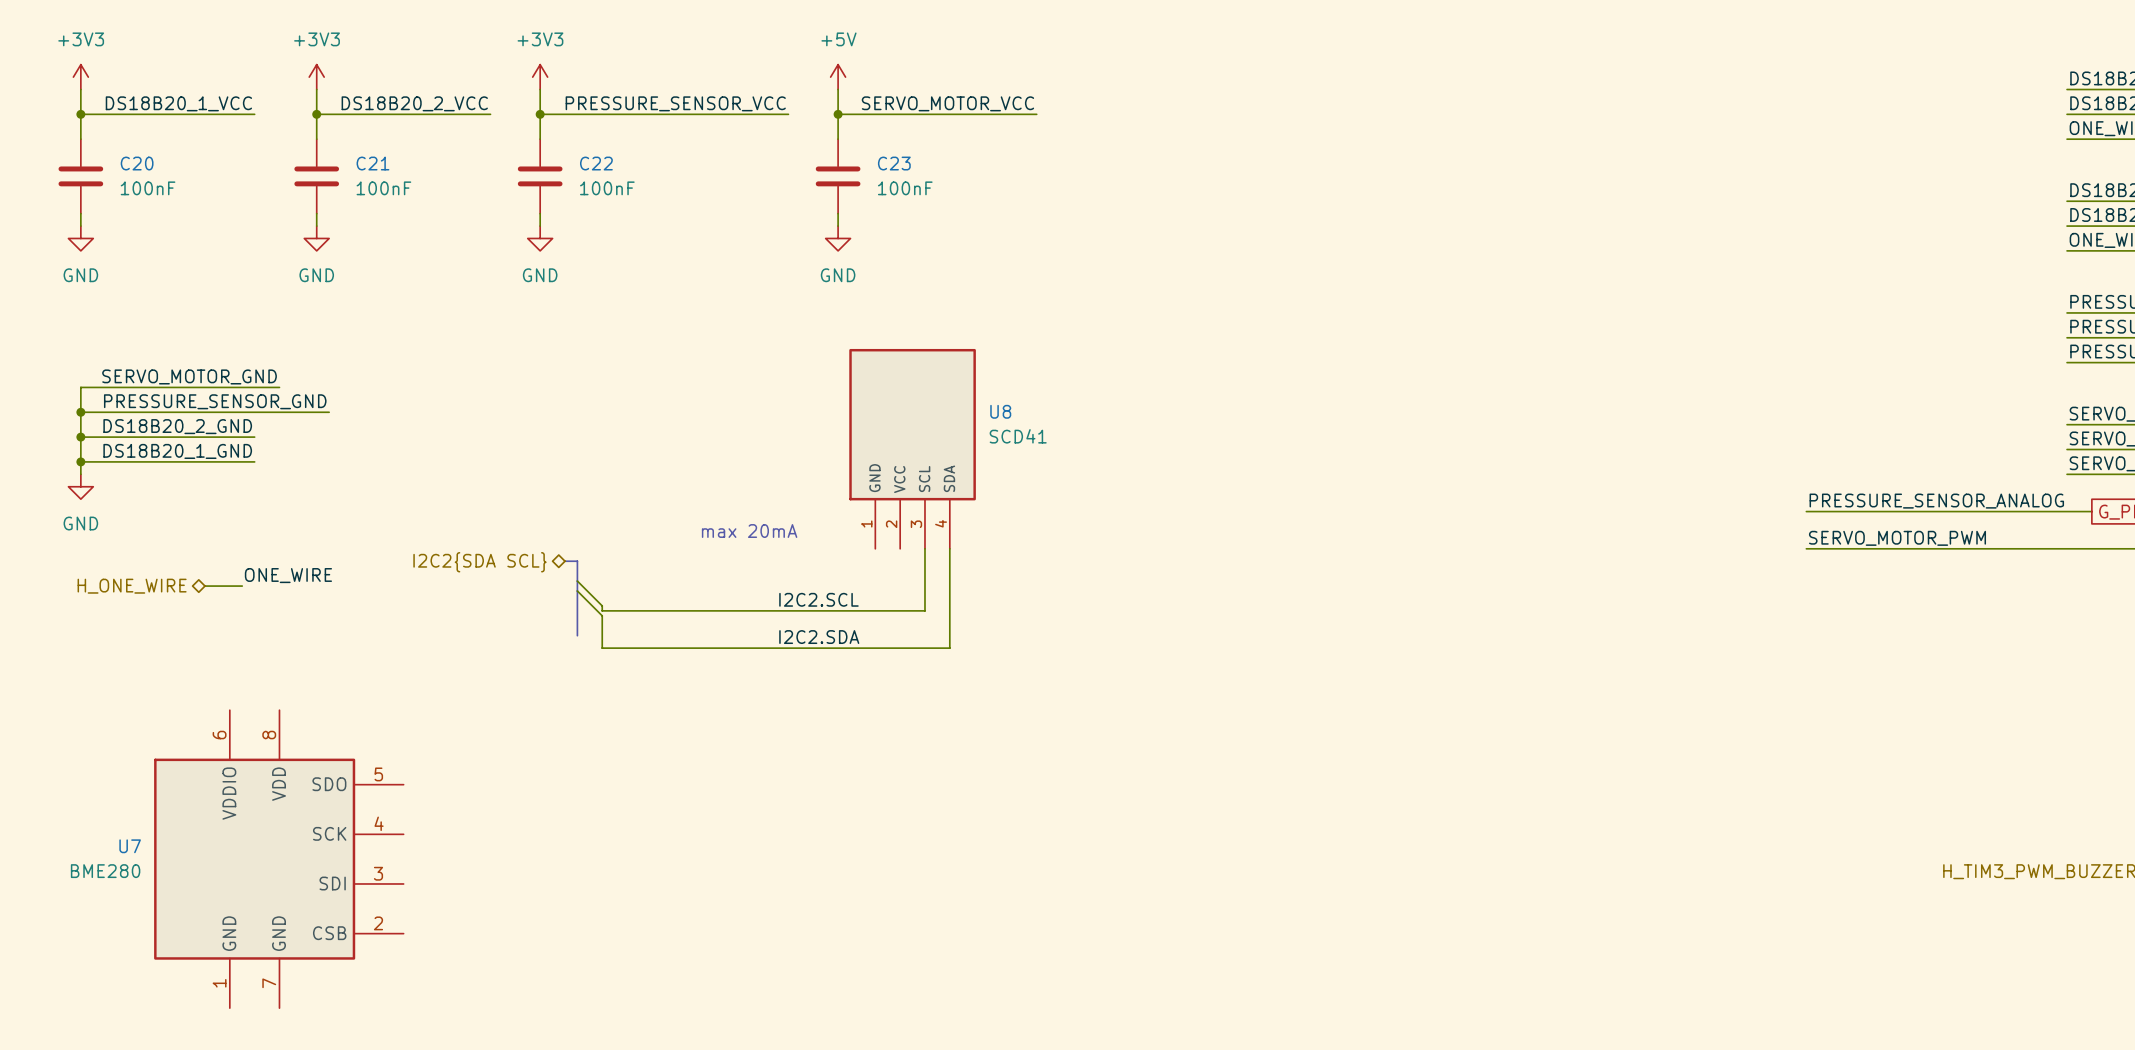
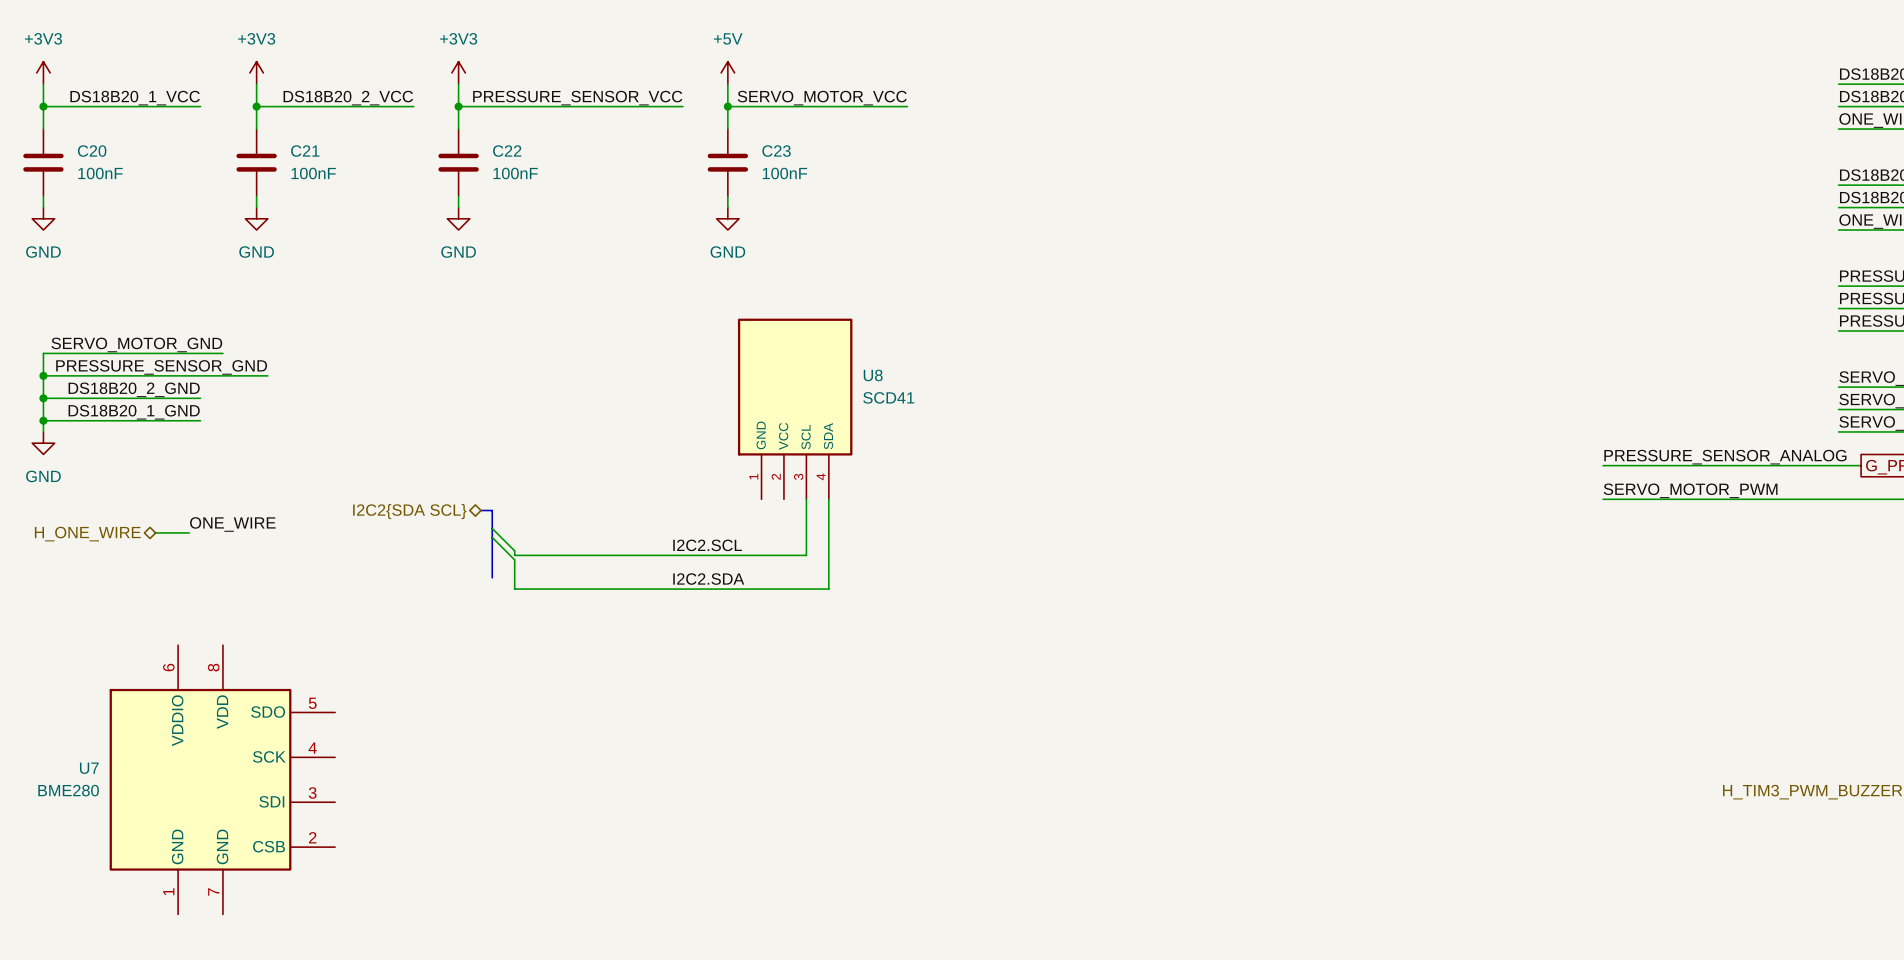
text: max 20mA (749, 531) -> none

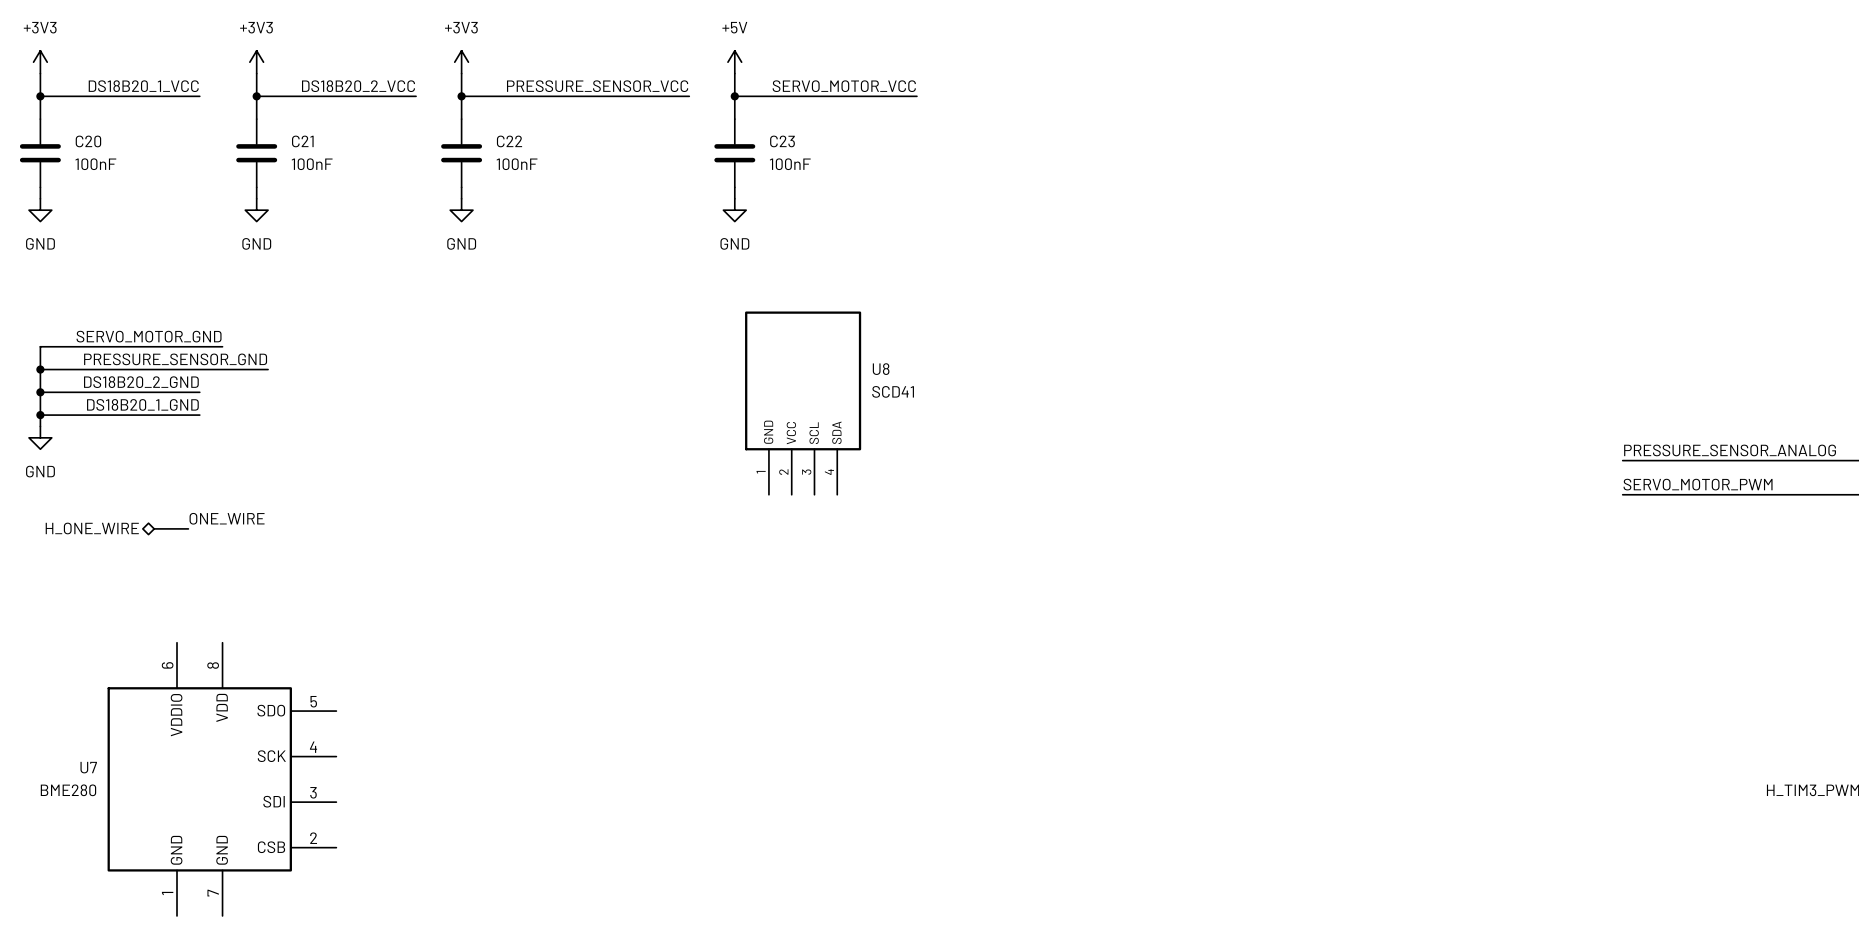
wire: (806, 499) (806, 555) (514, 555) (514, 550) (492, 528) -> none
wire: (828, 499) (828, 589) (514, 589) (514, 559) (492, 537) -> none
bus: (481, 510) (492, 510) (492, 577) -> none
hierarchical label: I2C2{SDA SCL} (409, 511) -> none
label: I2C2.SCL (707, 545) -> none
label: I2C2.SDA (708, 579) -> none

